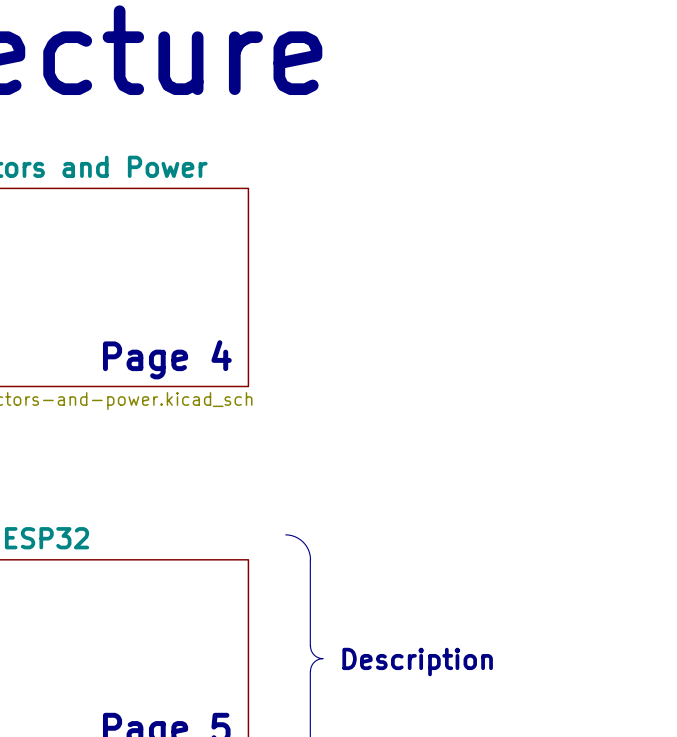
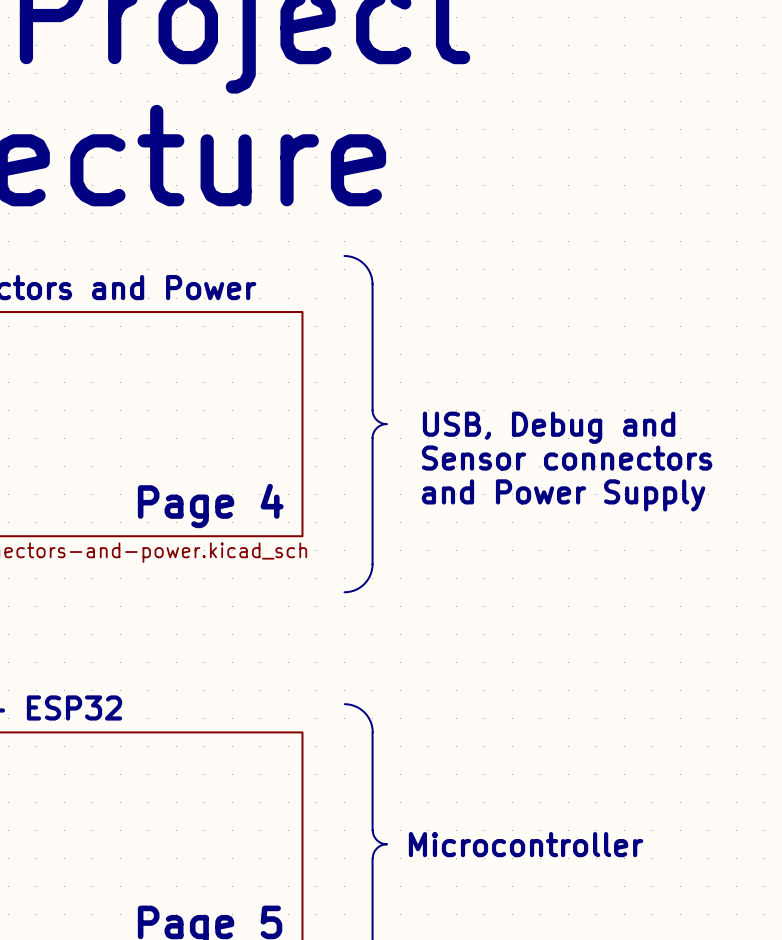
line: none -> (344, 255) (361, 261) (371, 276) (372, 411) (378, 421) (386, 424) (378, 427) (372, 436) (371, 570) (368, 579) (362, 586) (353, 590) (344, 592)
text: none -> USB, Debug and (549, 427)
text: none -> Sensor connectors (567, 458)
text: none -> and Power Supply (563, 495)
text: Description (417, 662) -> Microcontroller (526, 844)

